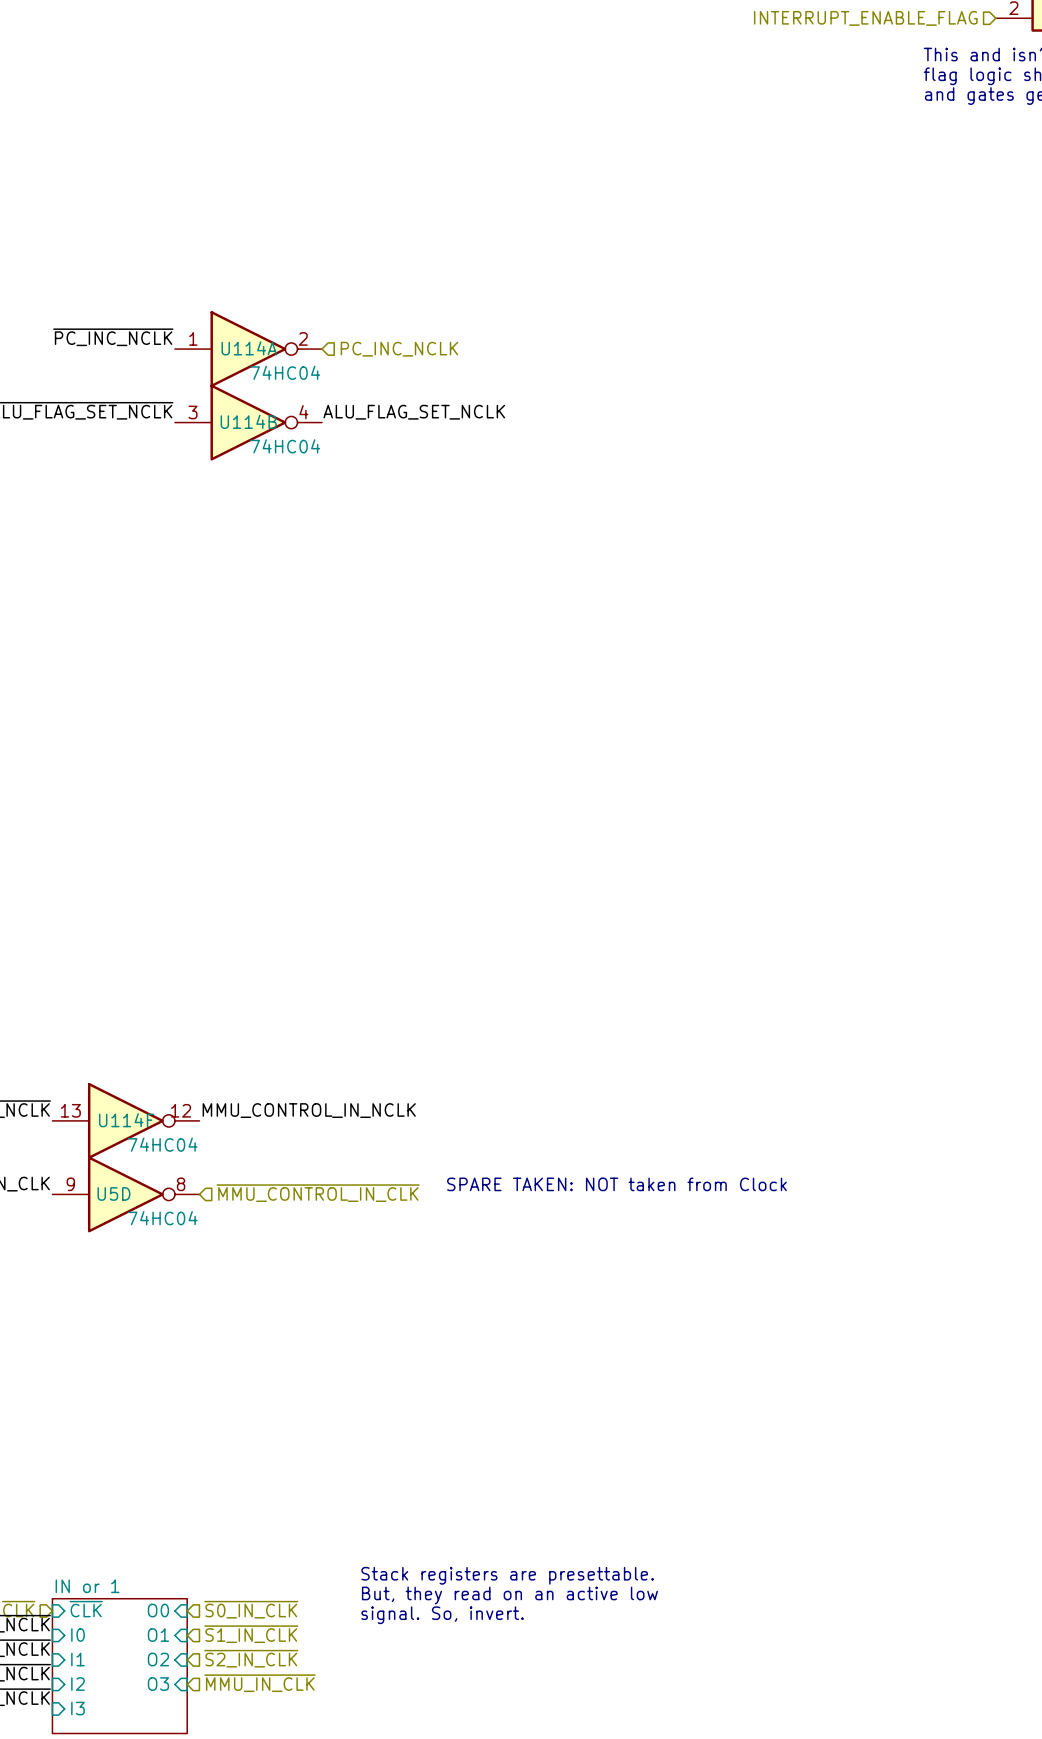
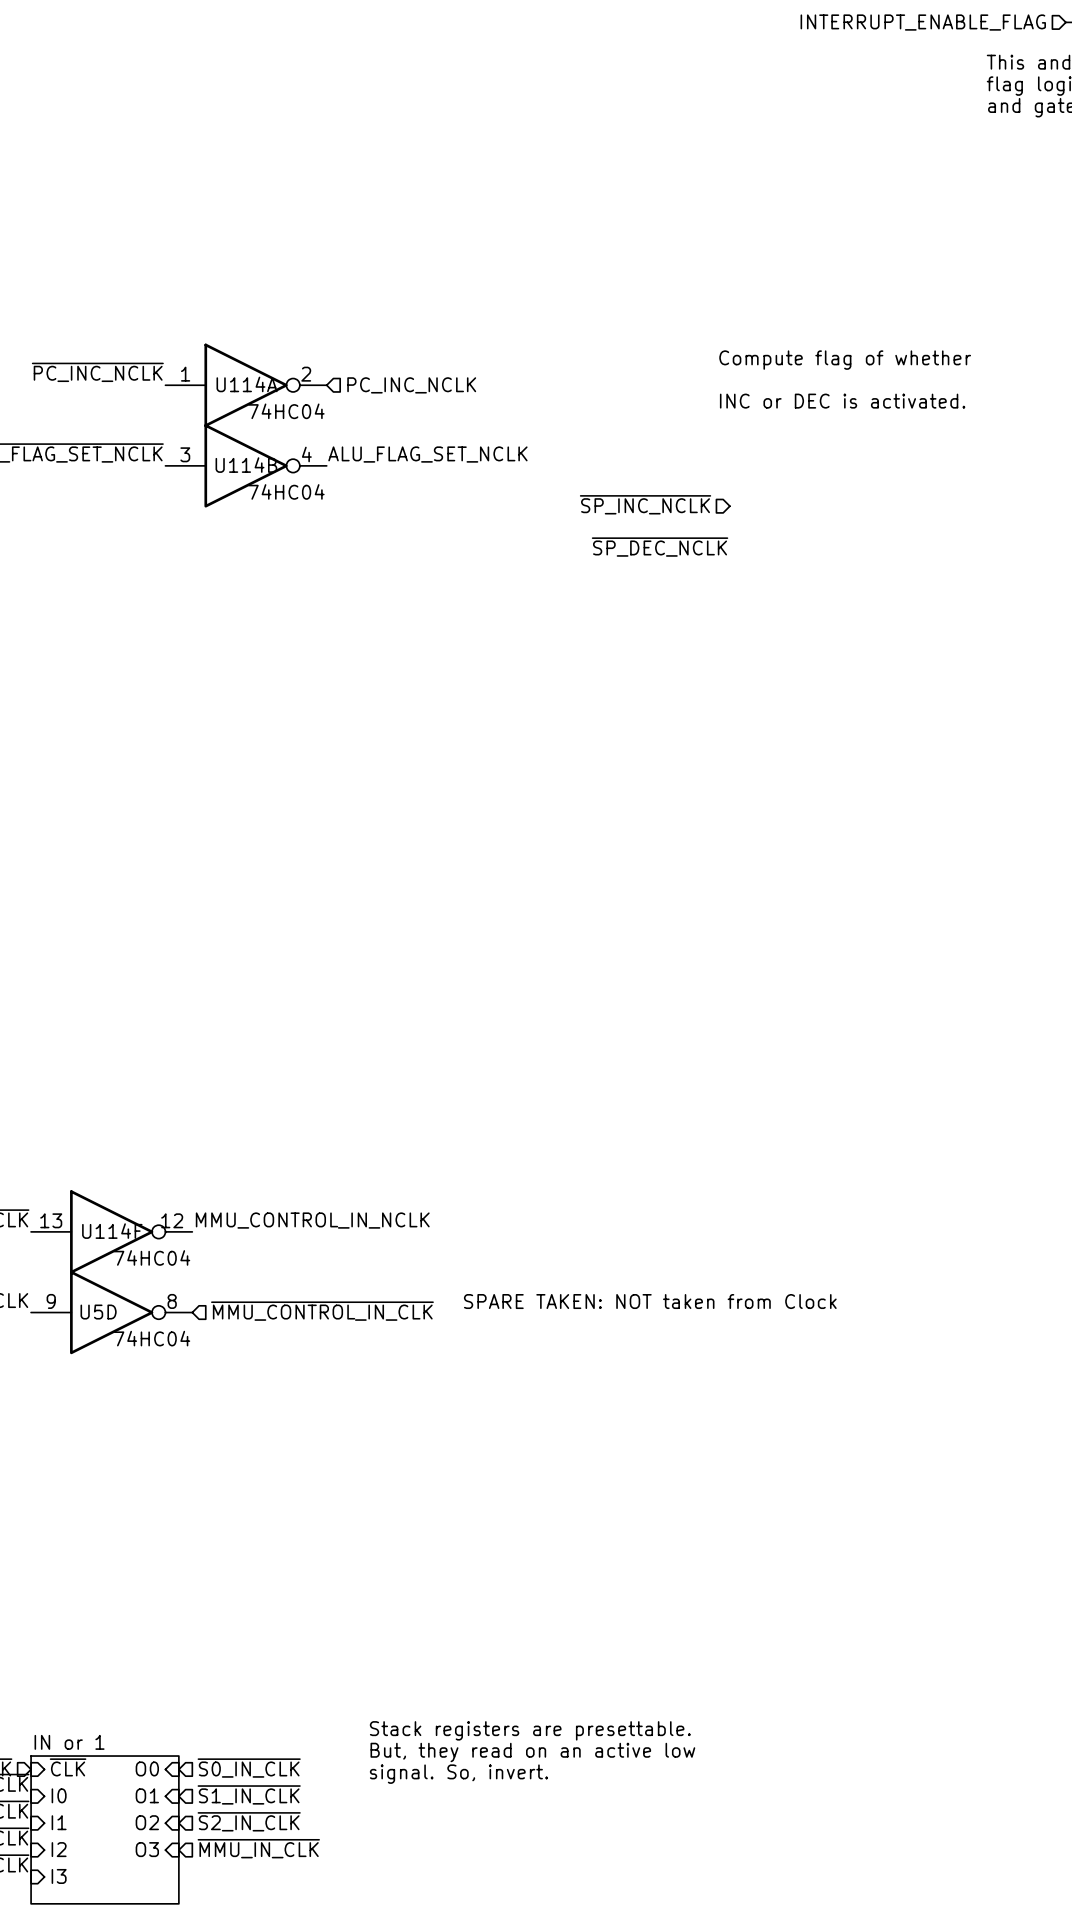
text: none -> Compute flag of whether (845, 360)
text: none -> INC or DEC is activated. (842, 401)
hierarchical label: none -> ~{SP_INC_NCLK} (645, 504)
label: none -> ~{SP_DEC_NCLK} (660, 547)

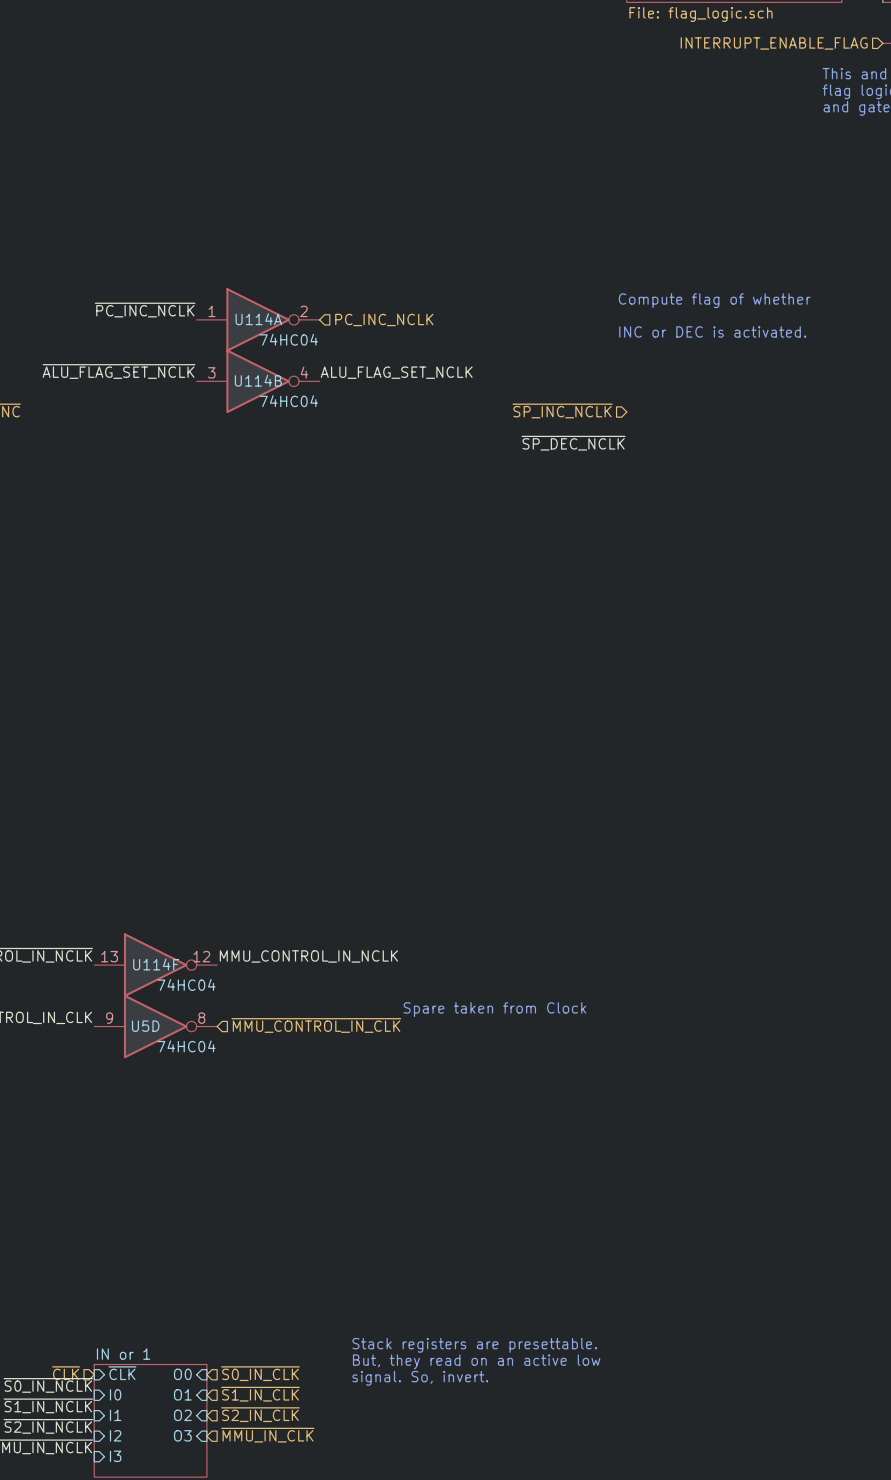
text: SPARE TAKEN: NOT taken from Clock (650, 1301) -> Spare taken from Clock (494, 1009)

